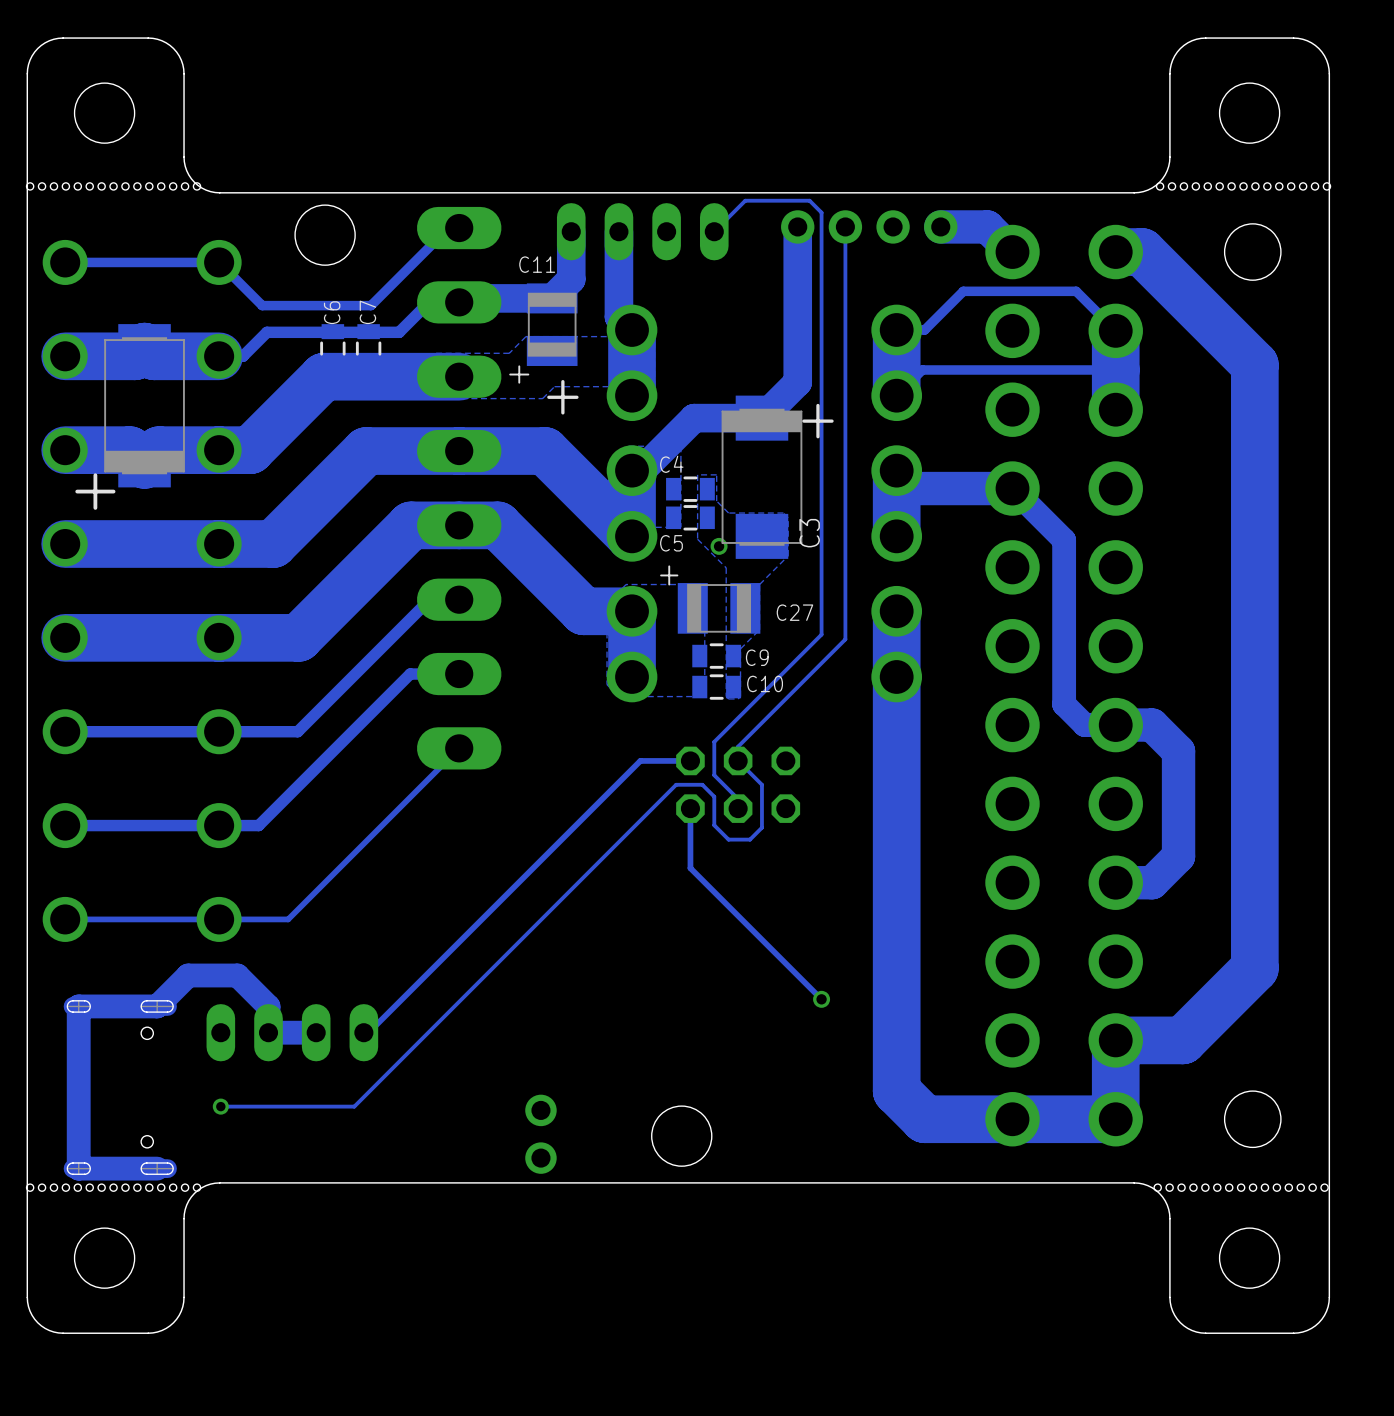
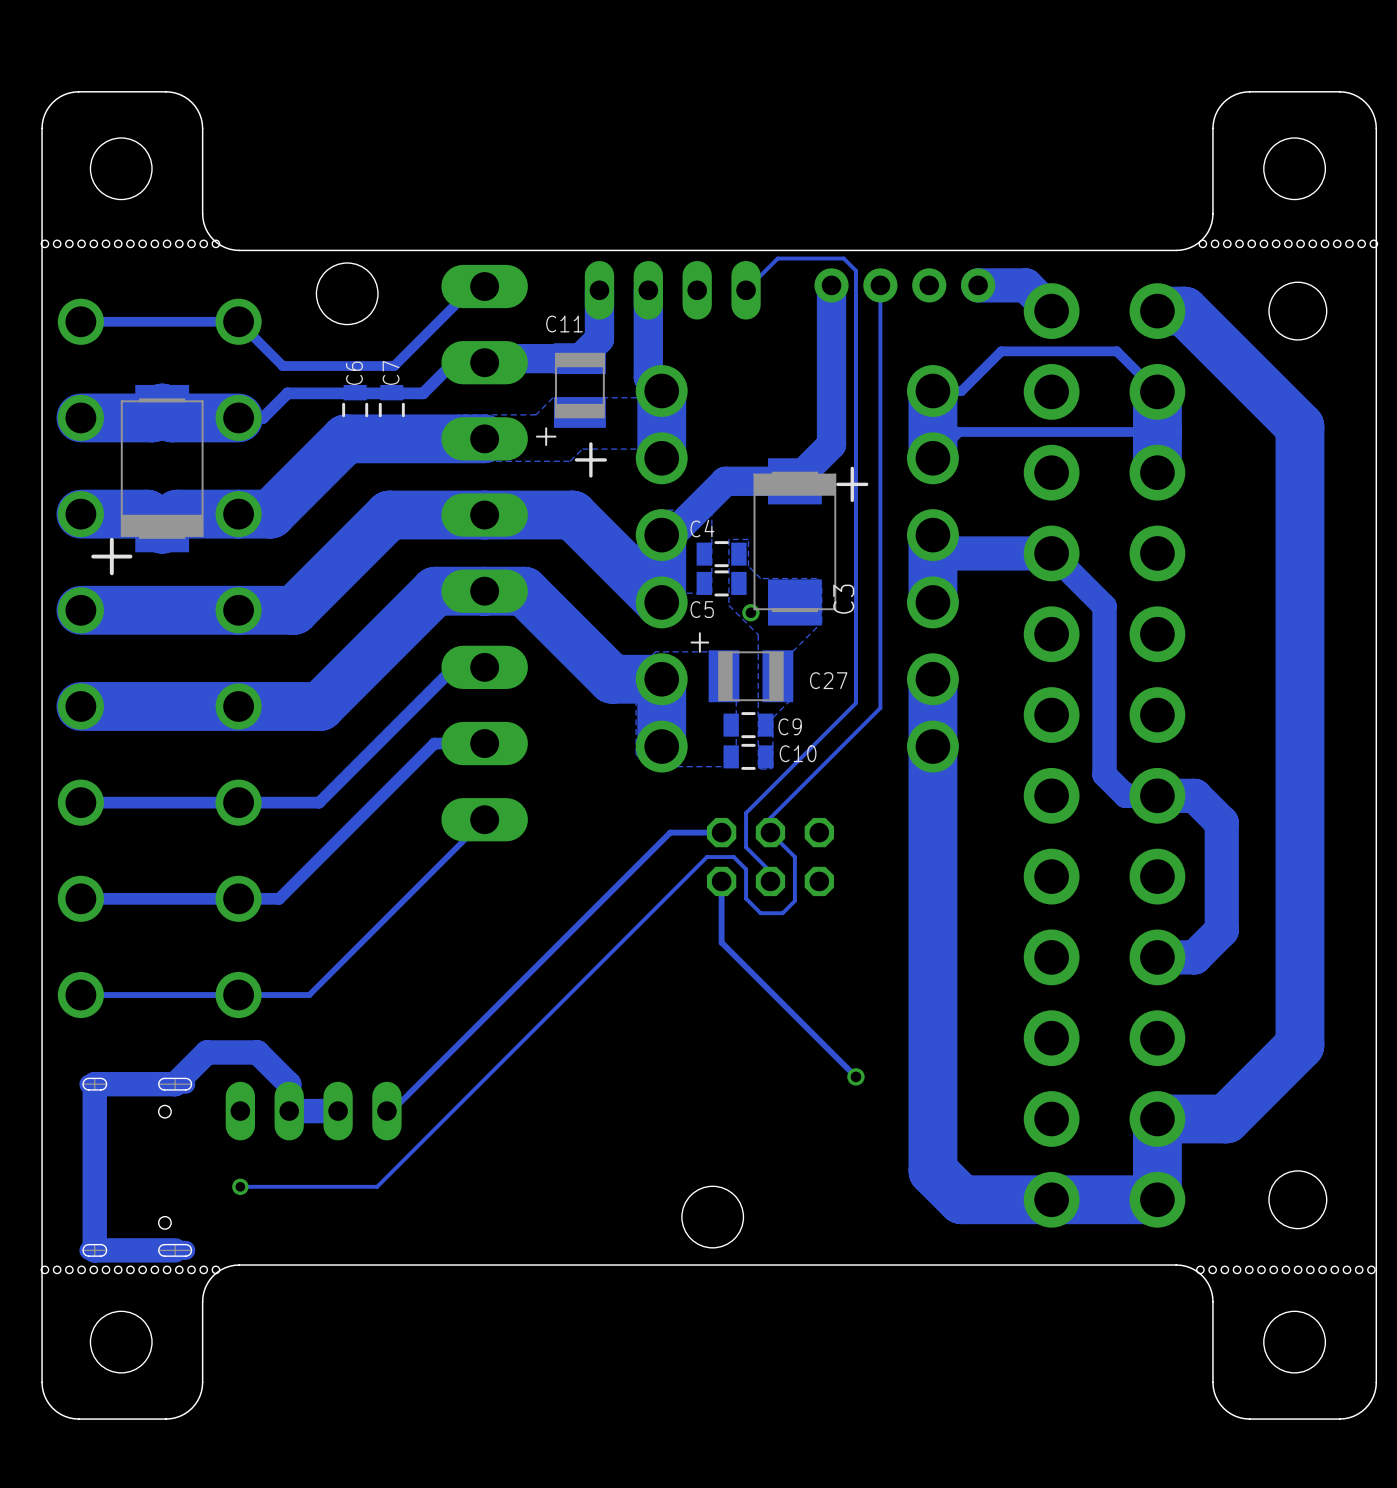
part: (540, 1134) -> none

